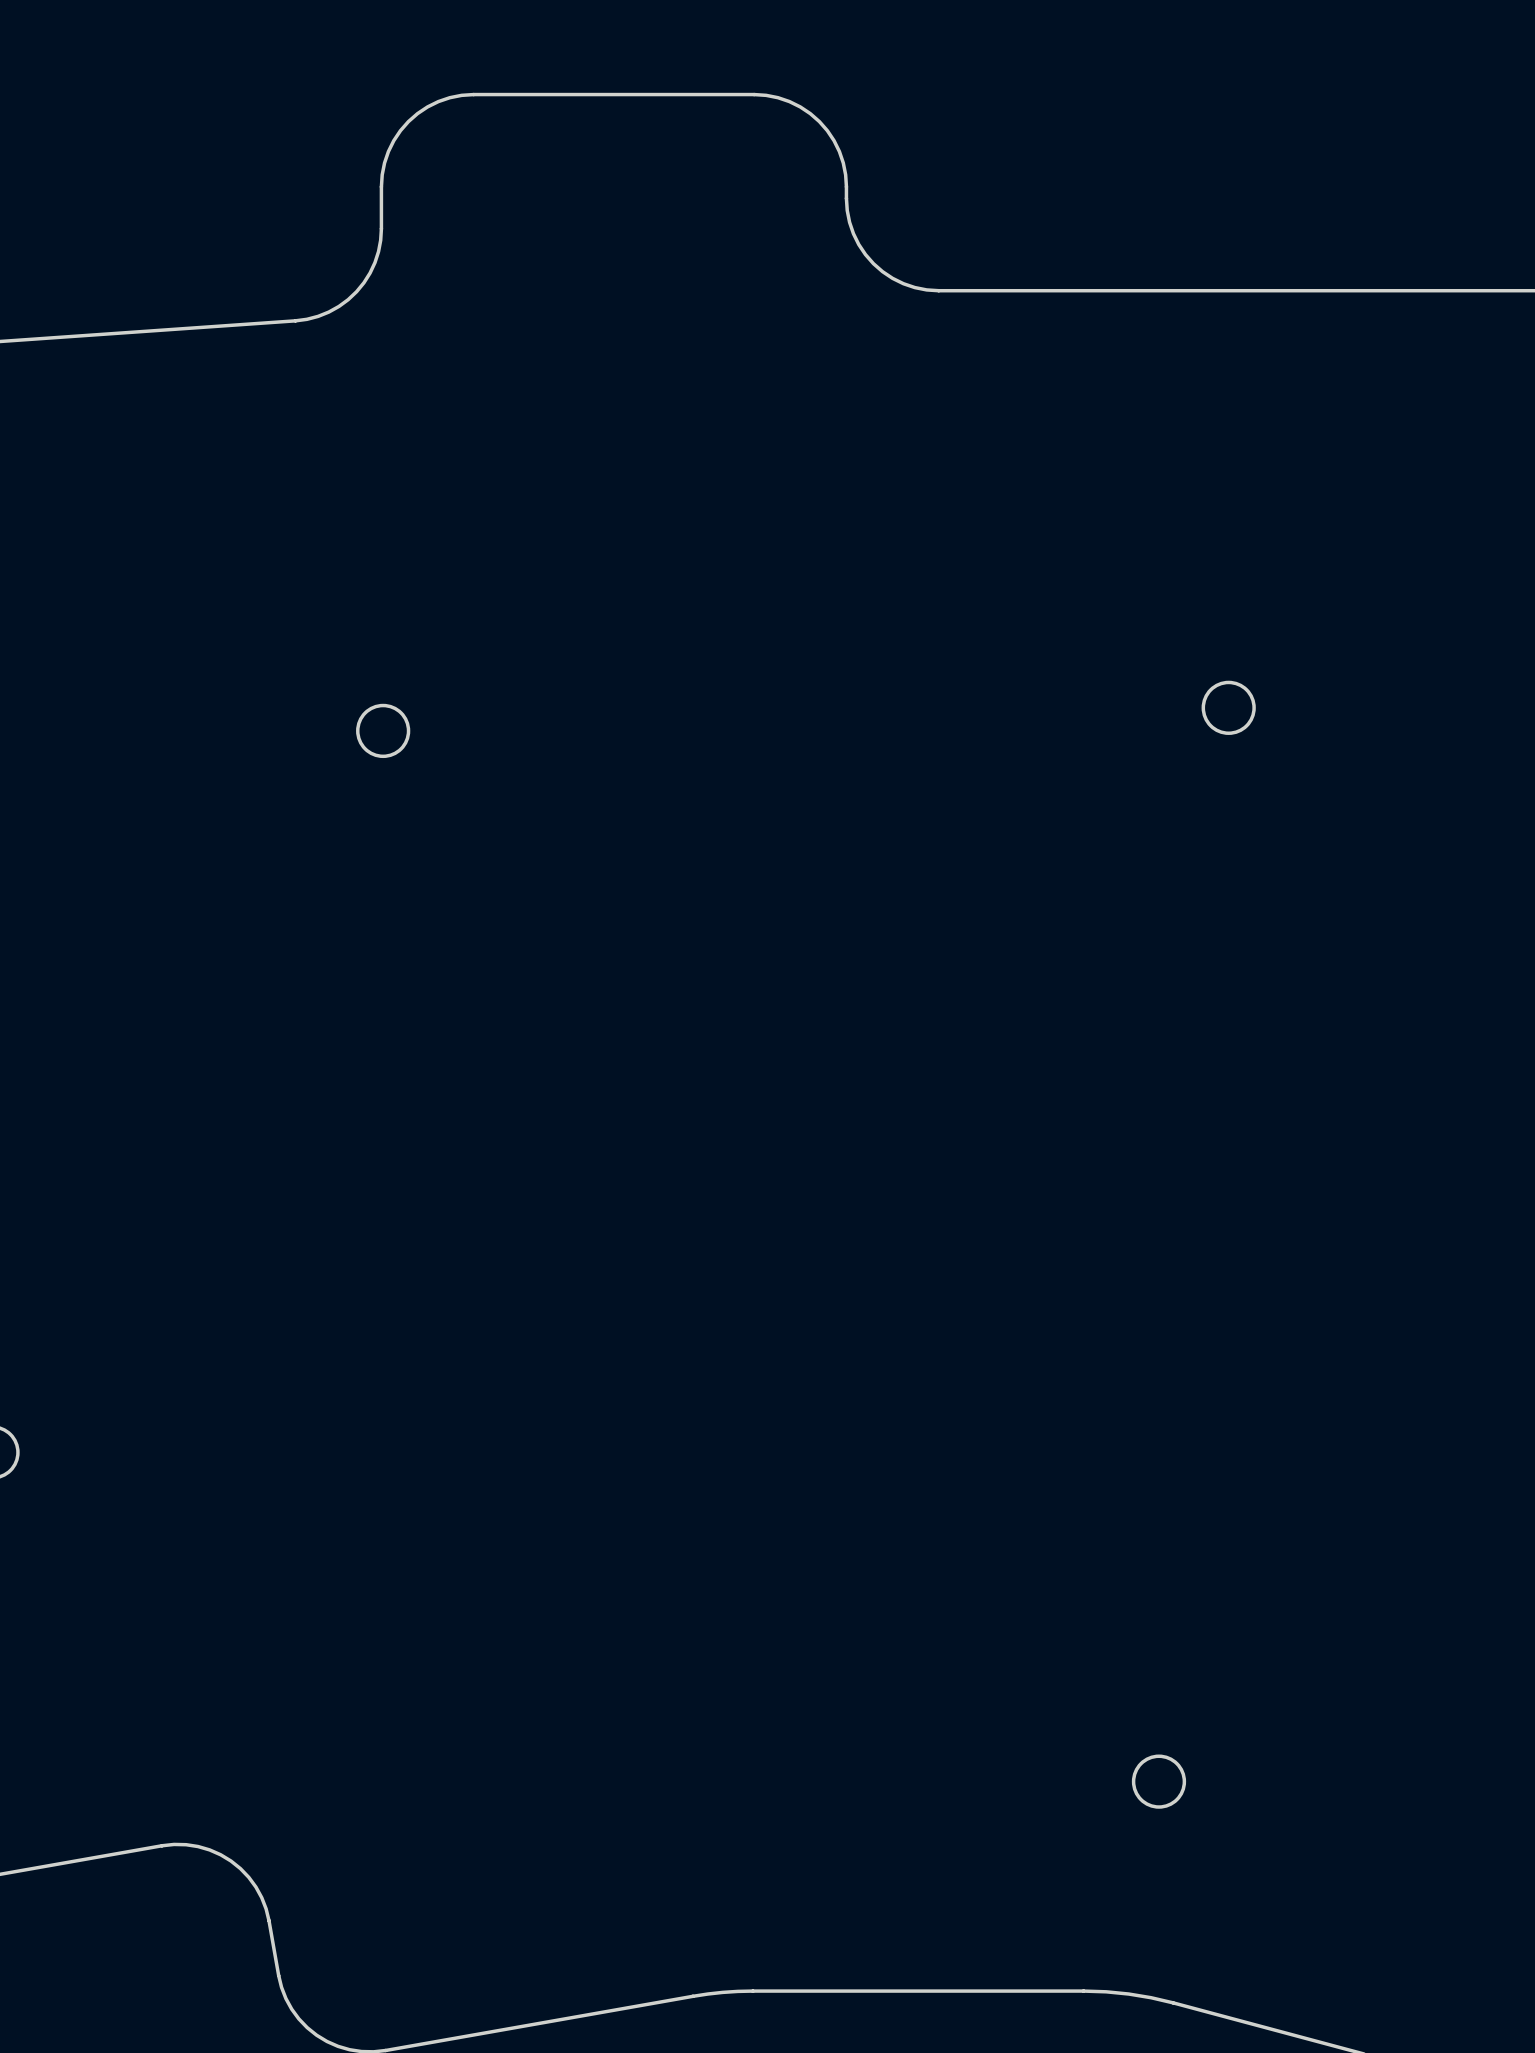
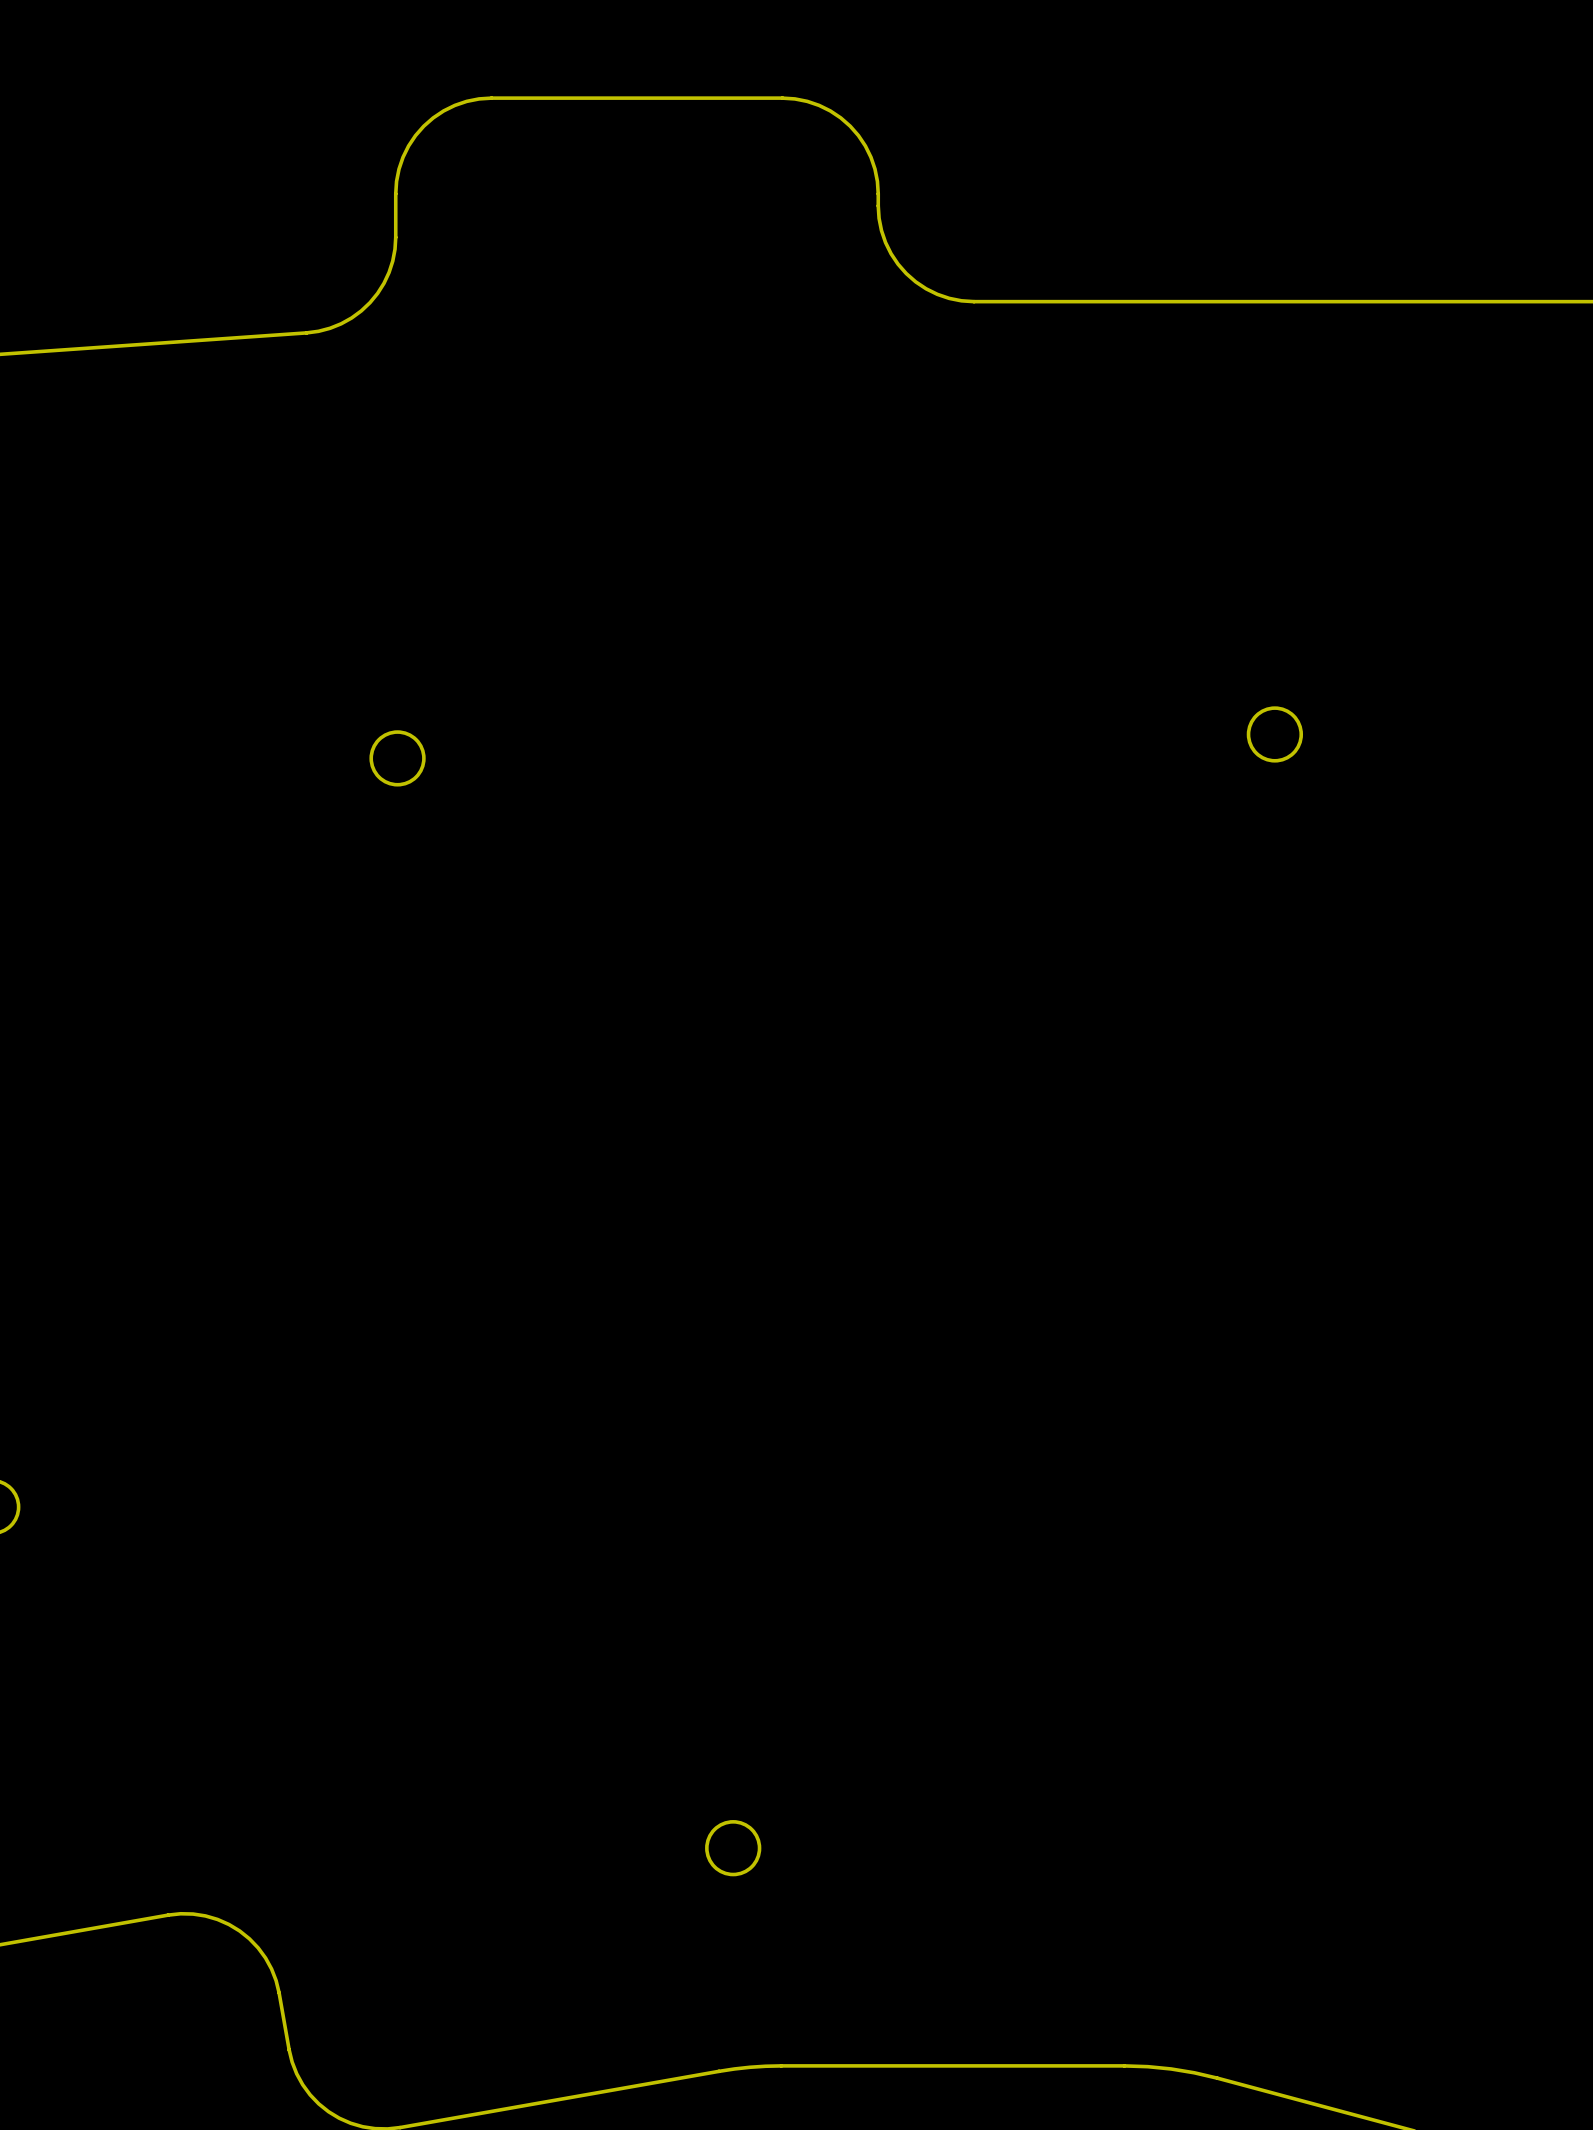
round board edge position: (1158, 1781) -> (733, 1848)

